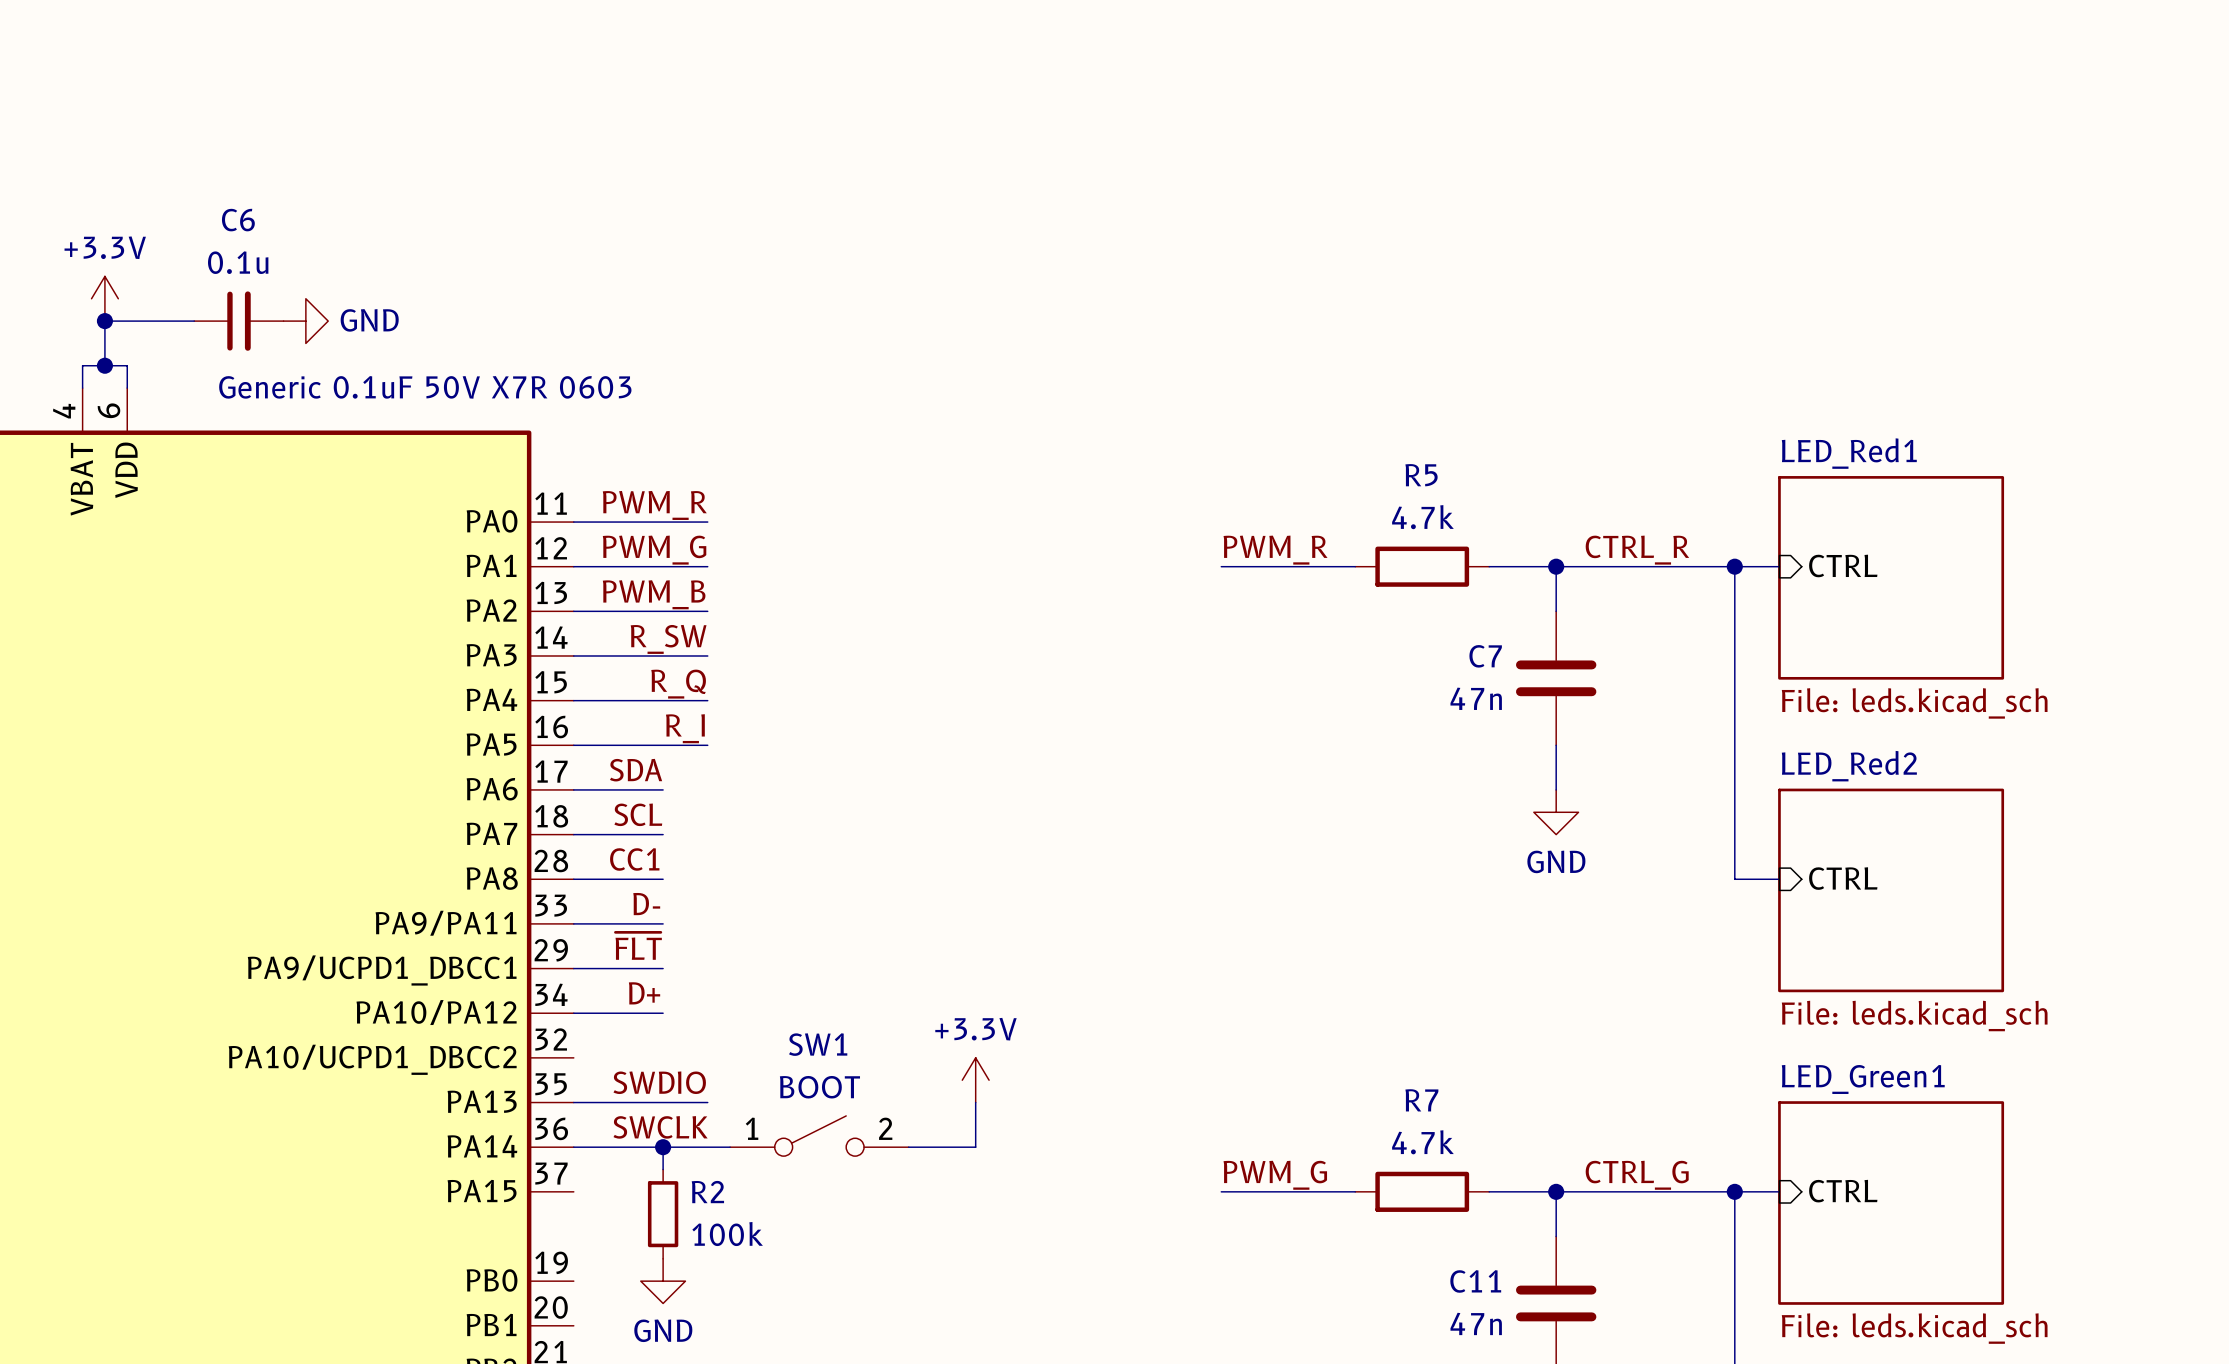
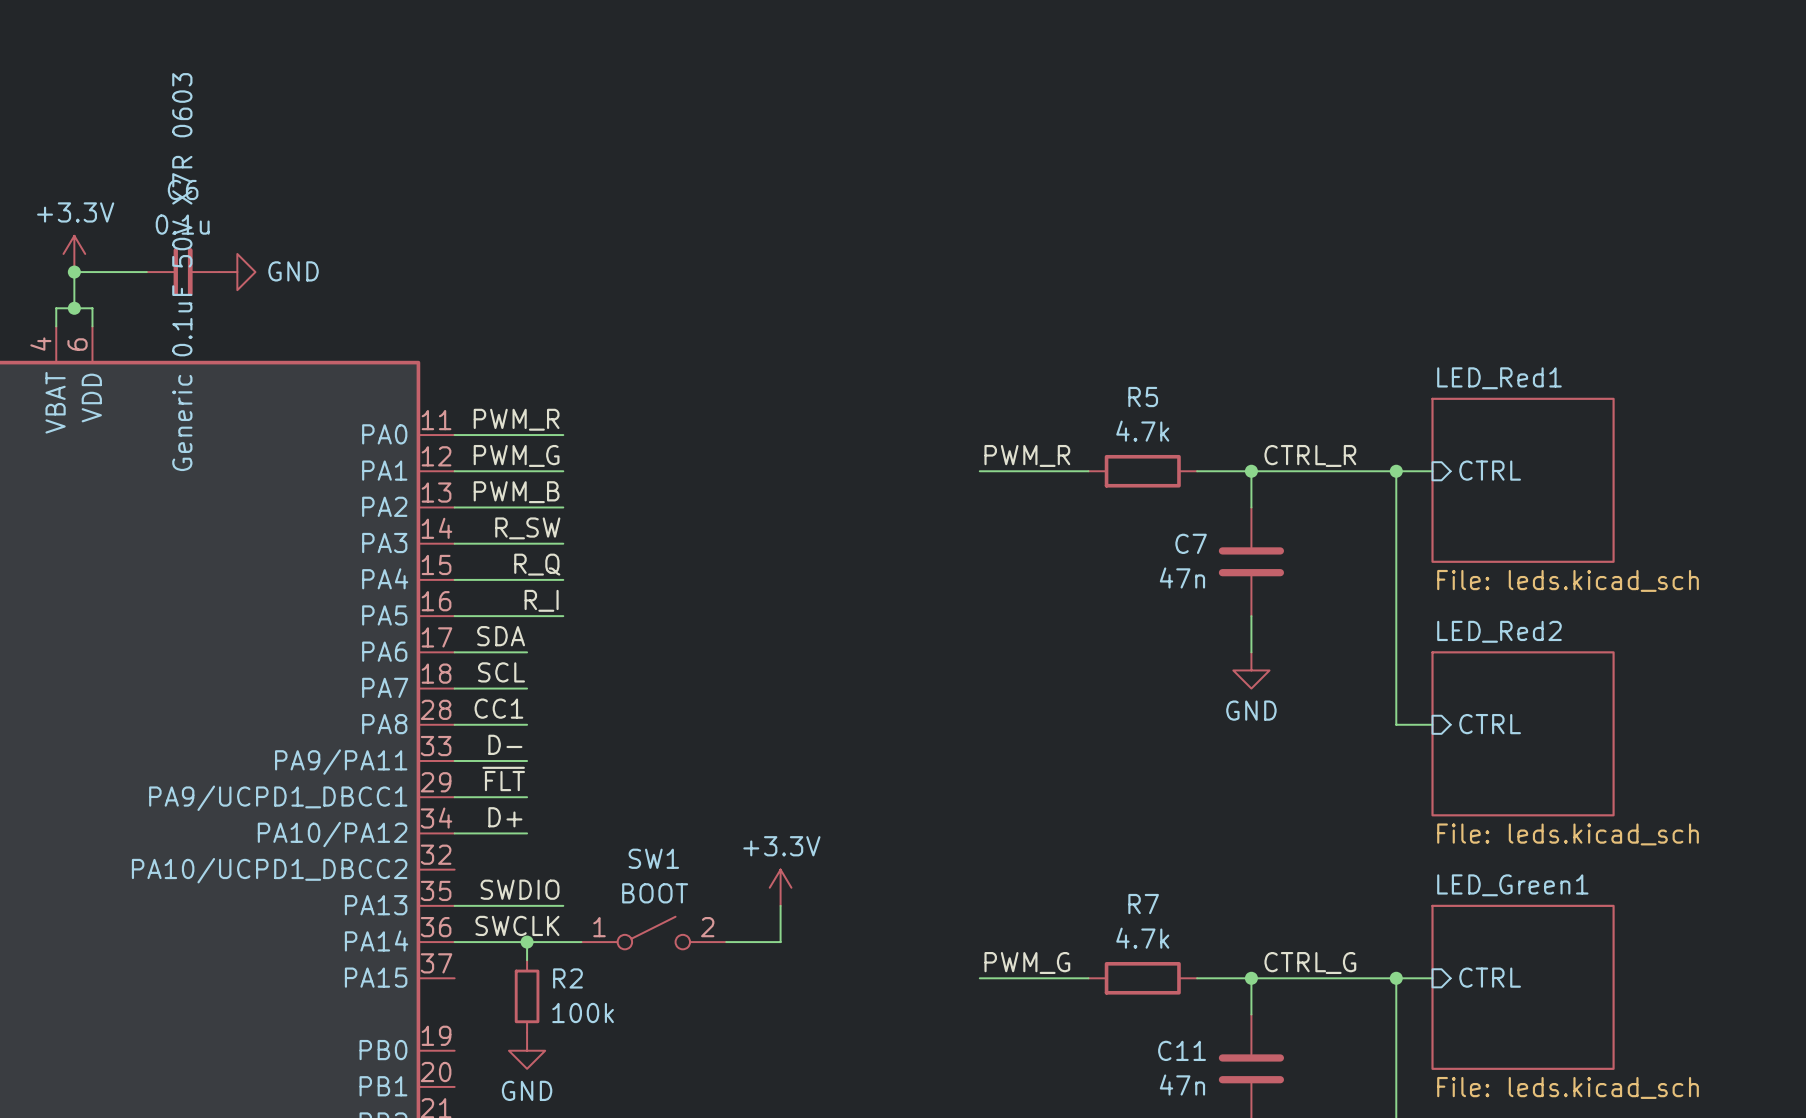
C6 text rotation: 0° (425, 387) -> 90° counterclockwise (182, 272)

